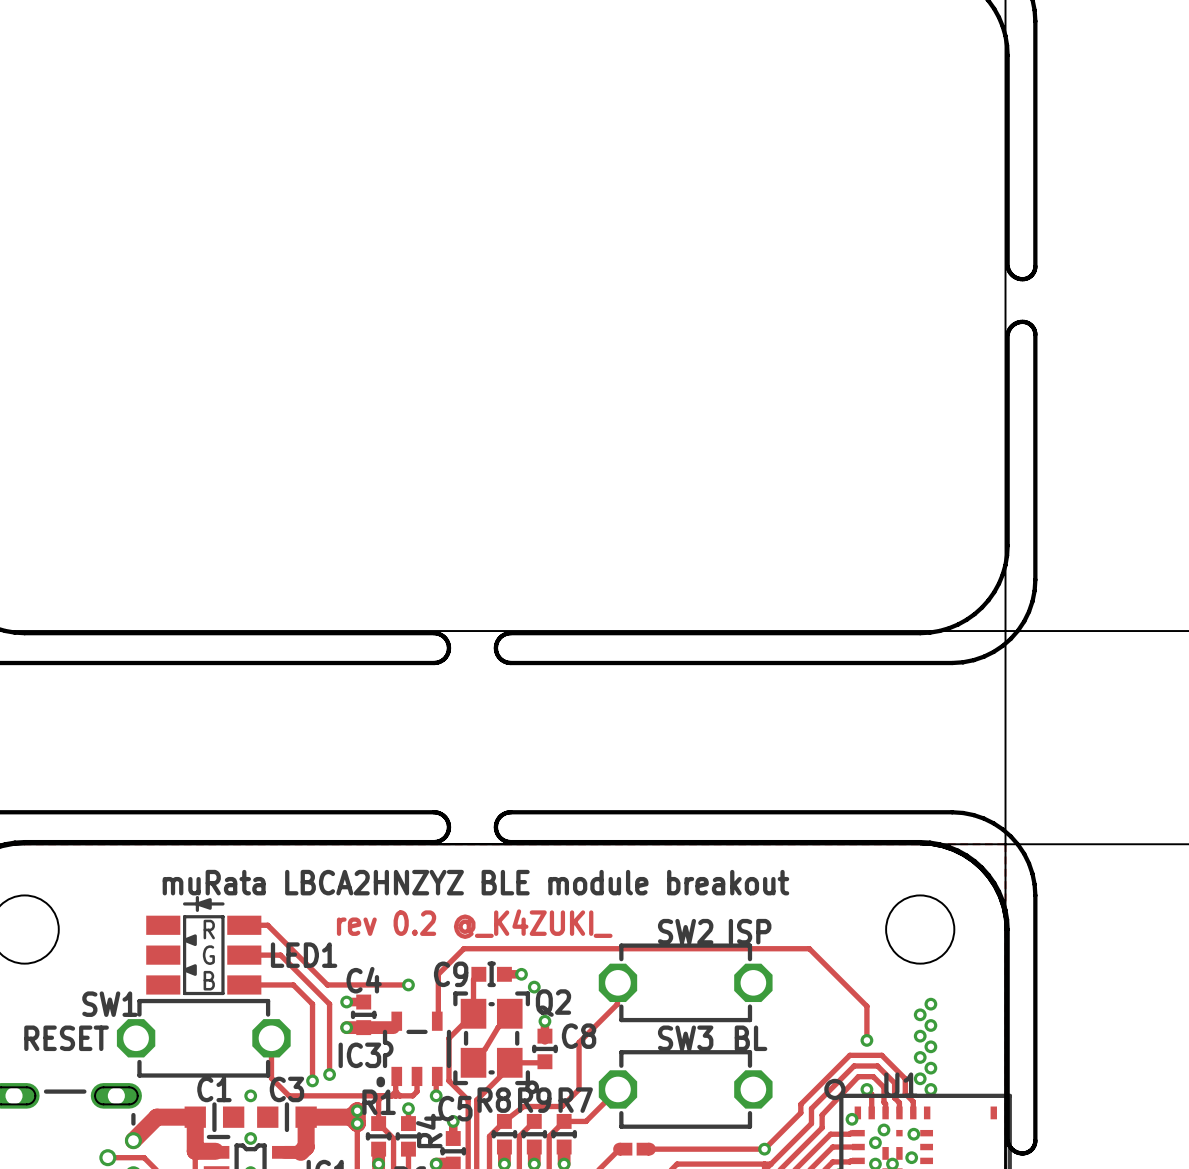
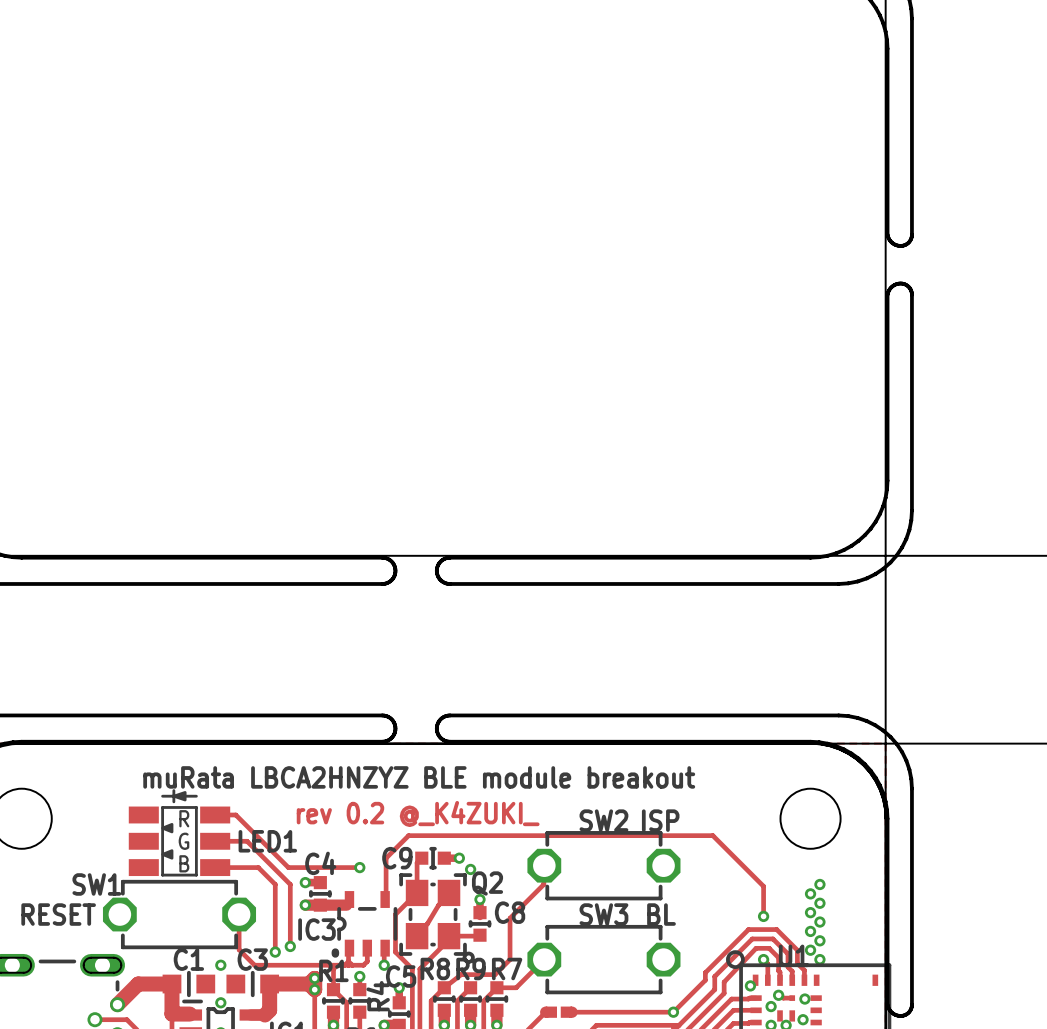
track: none -> (782, 997) (792, 998)

